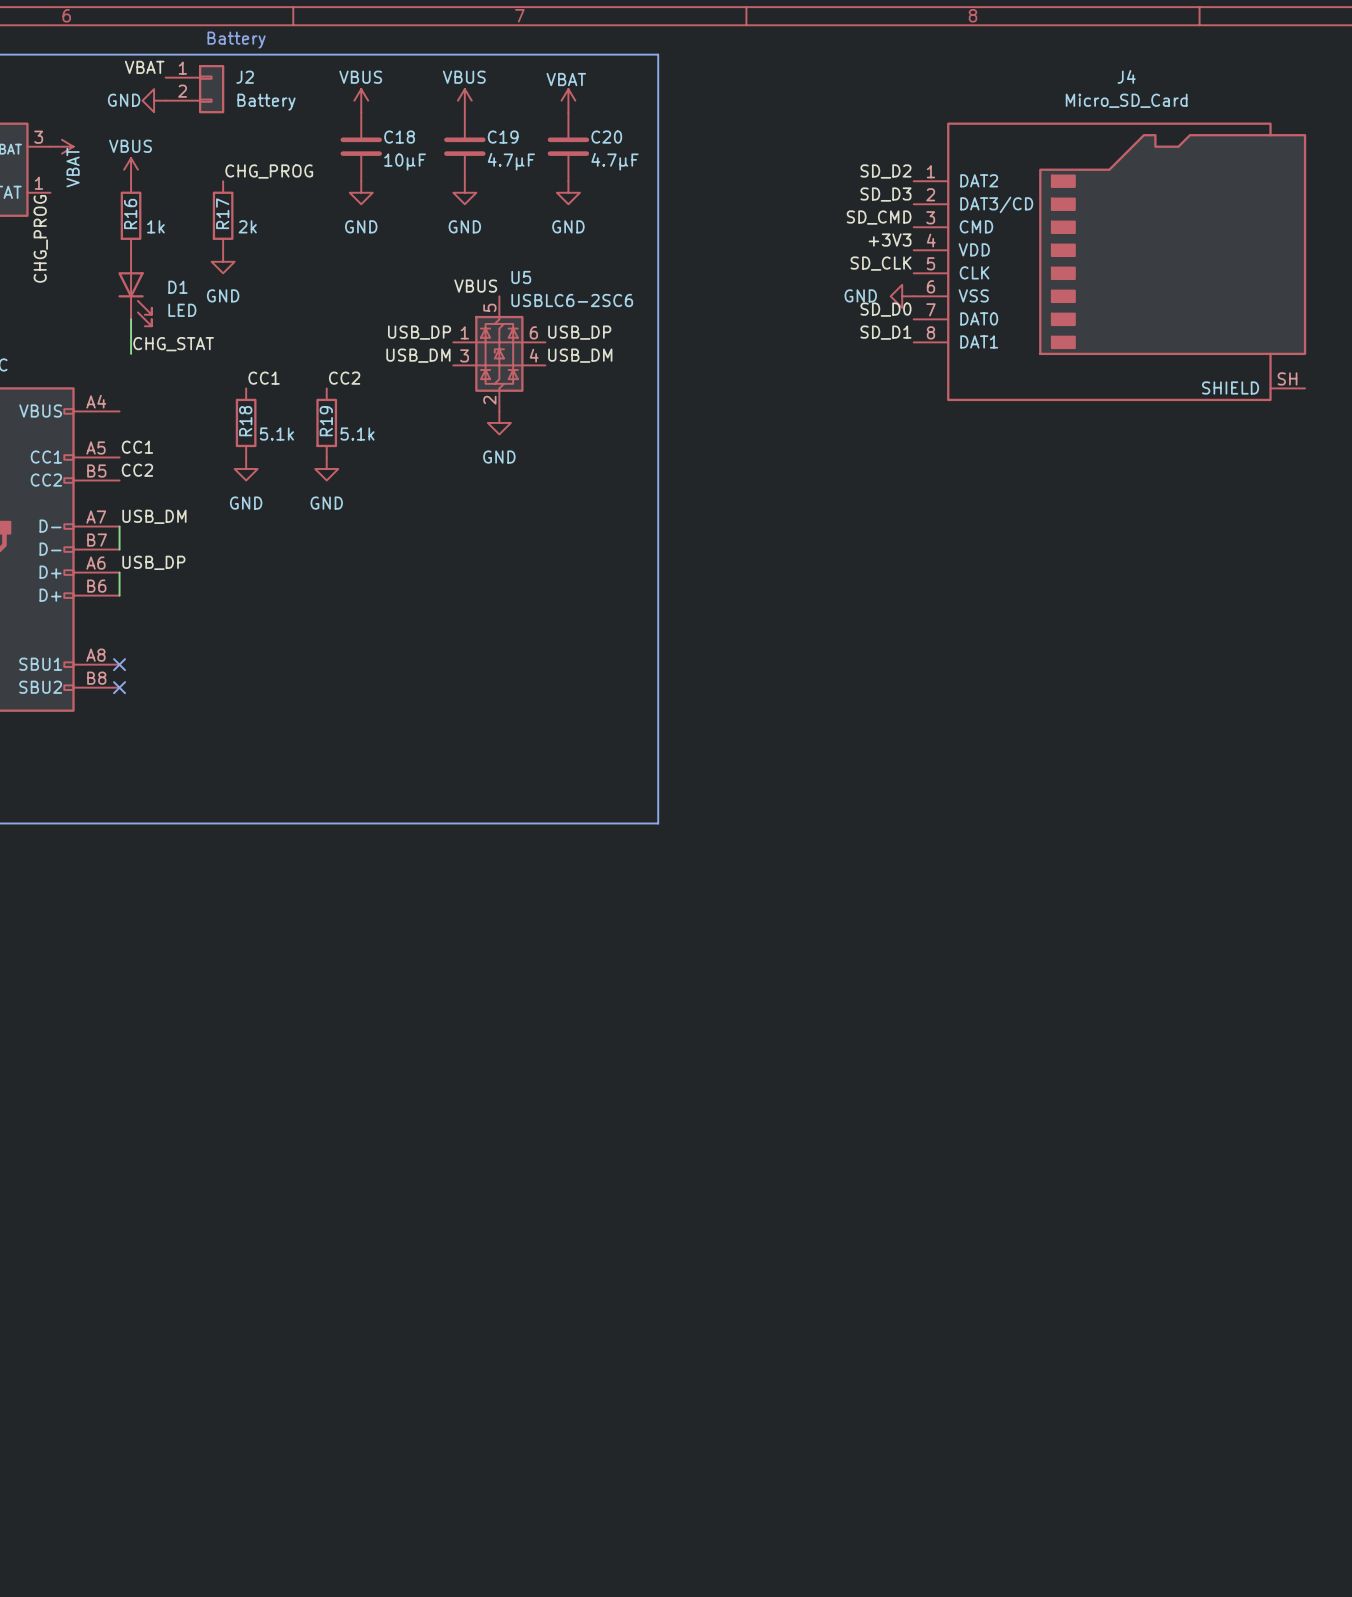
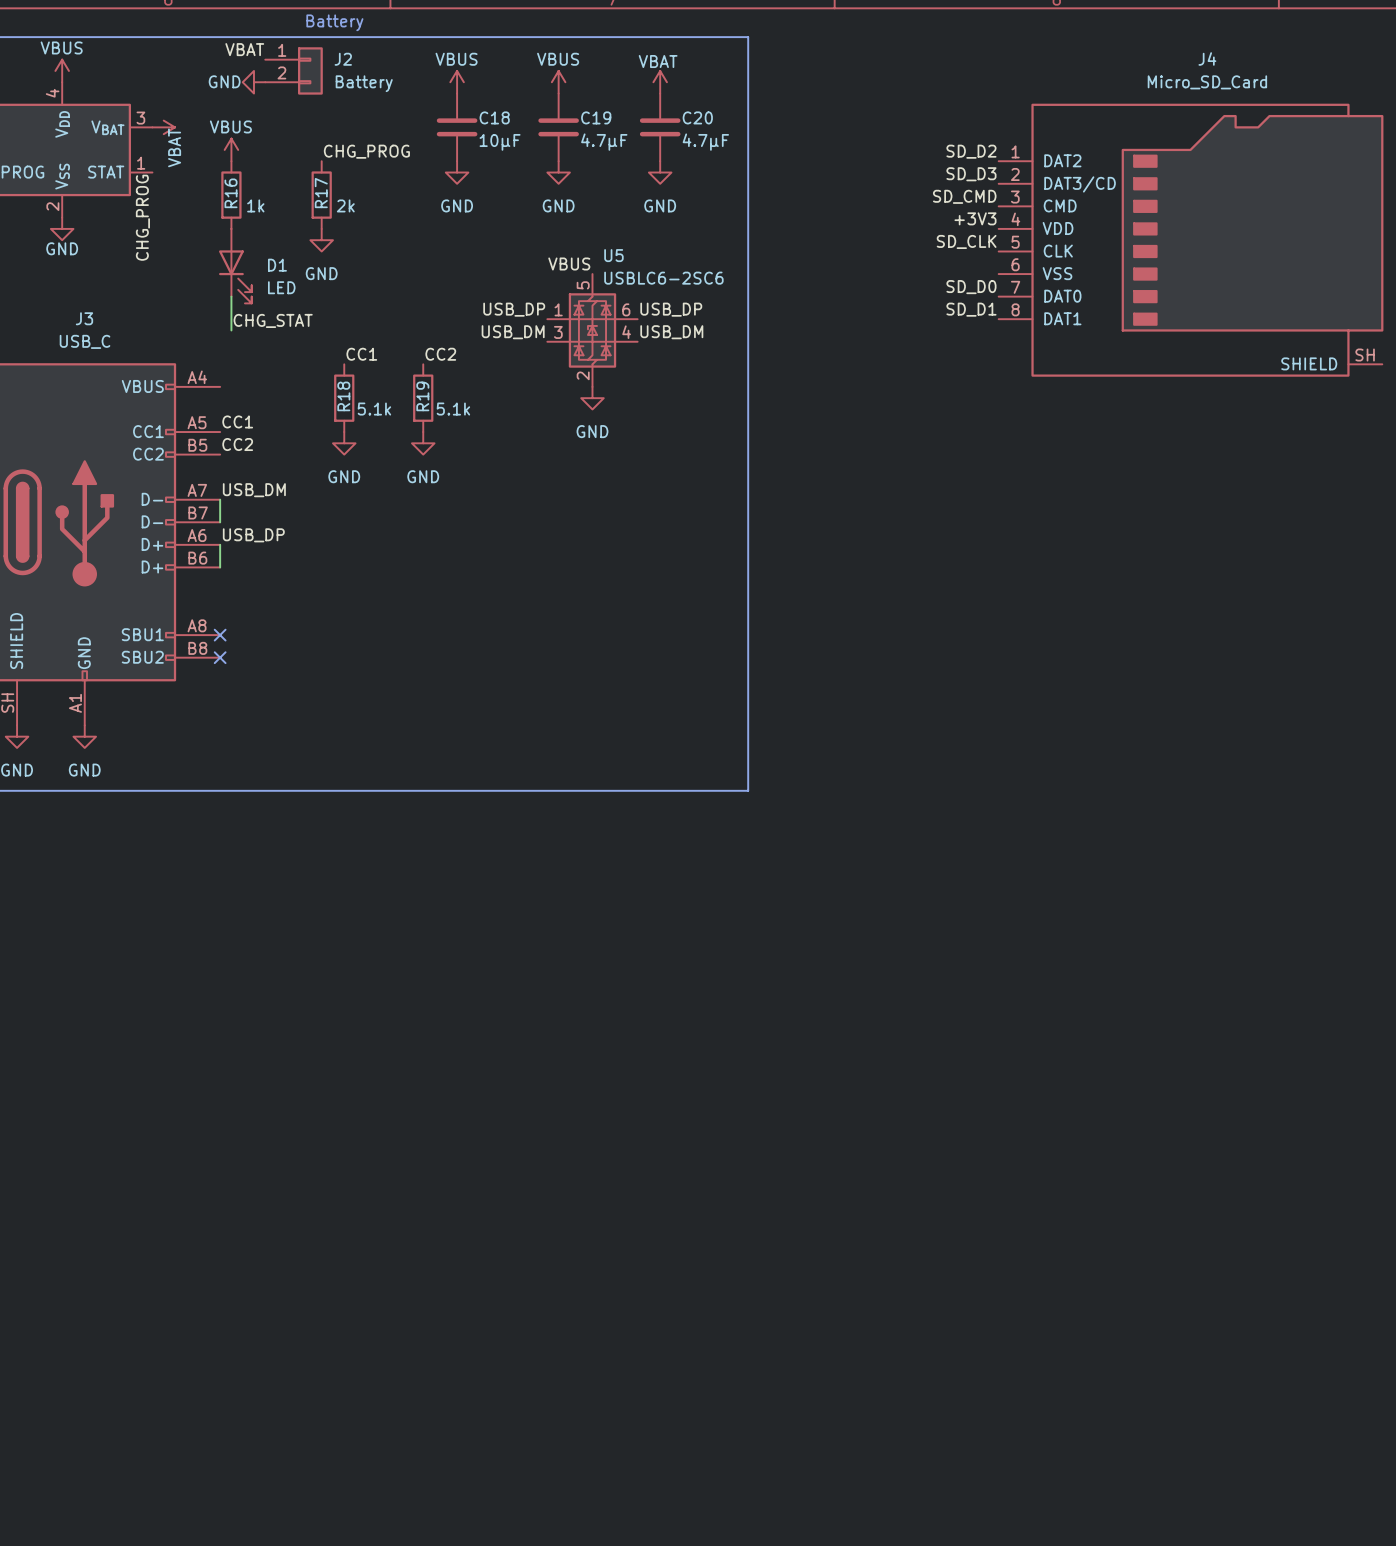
power symbol: GND (902, 296) -> none

